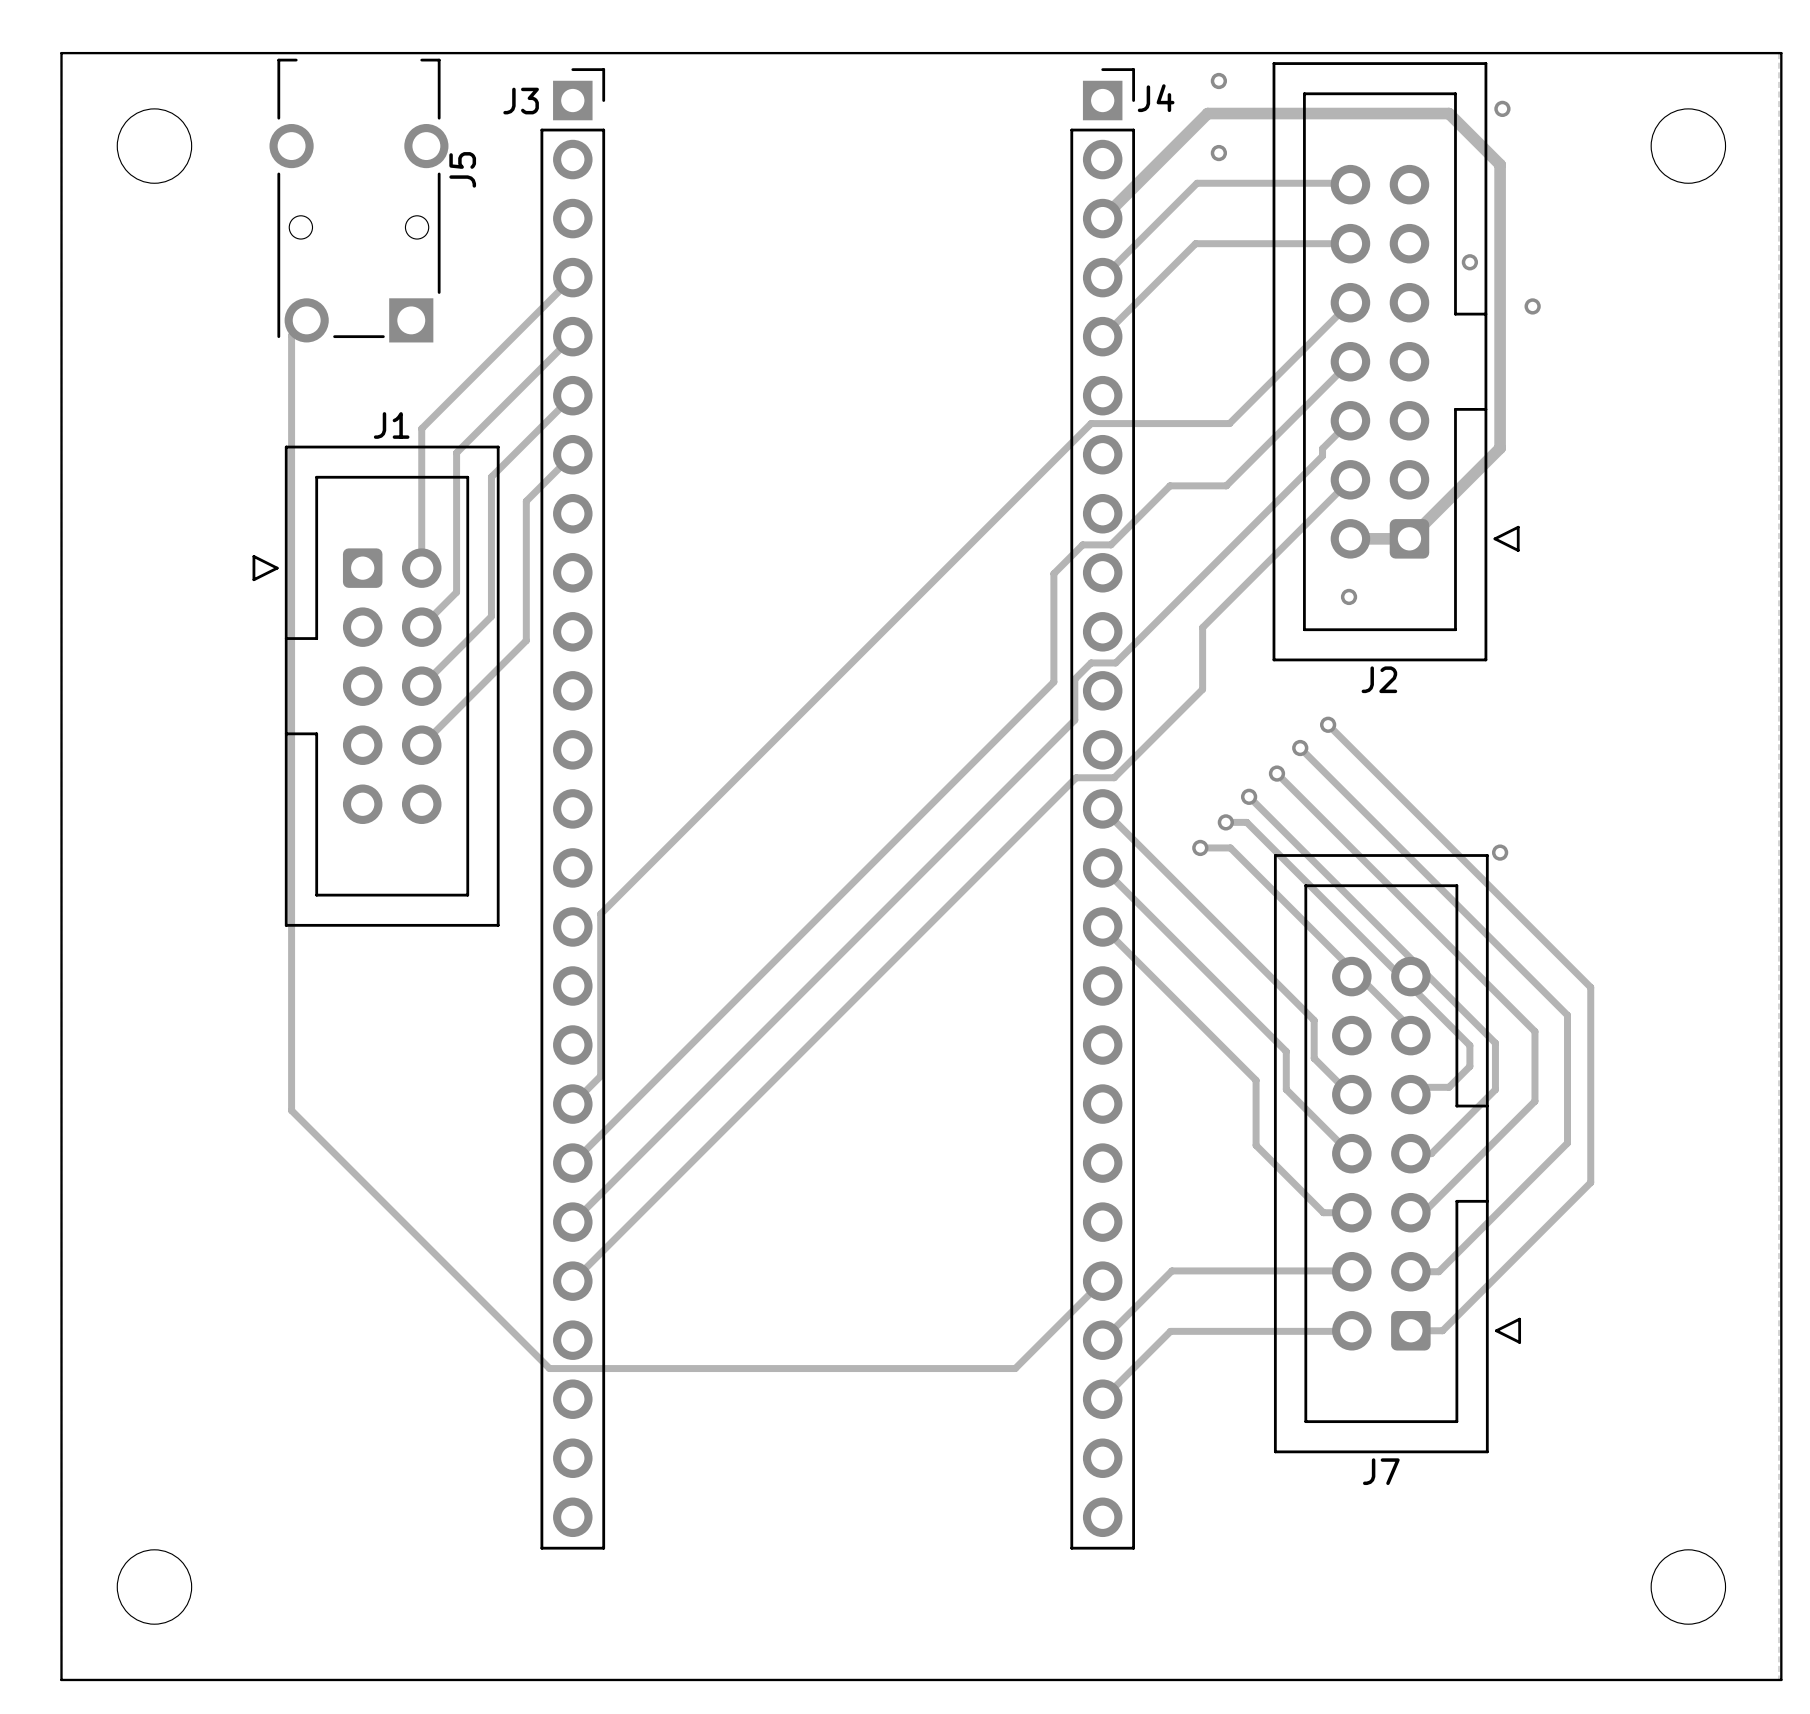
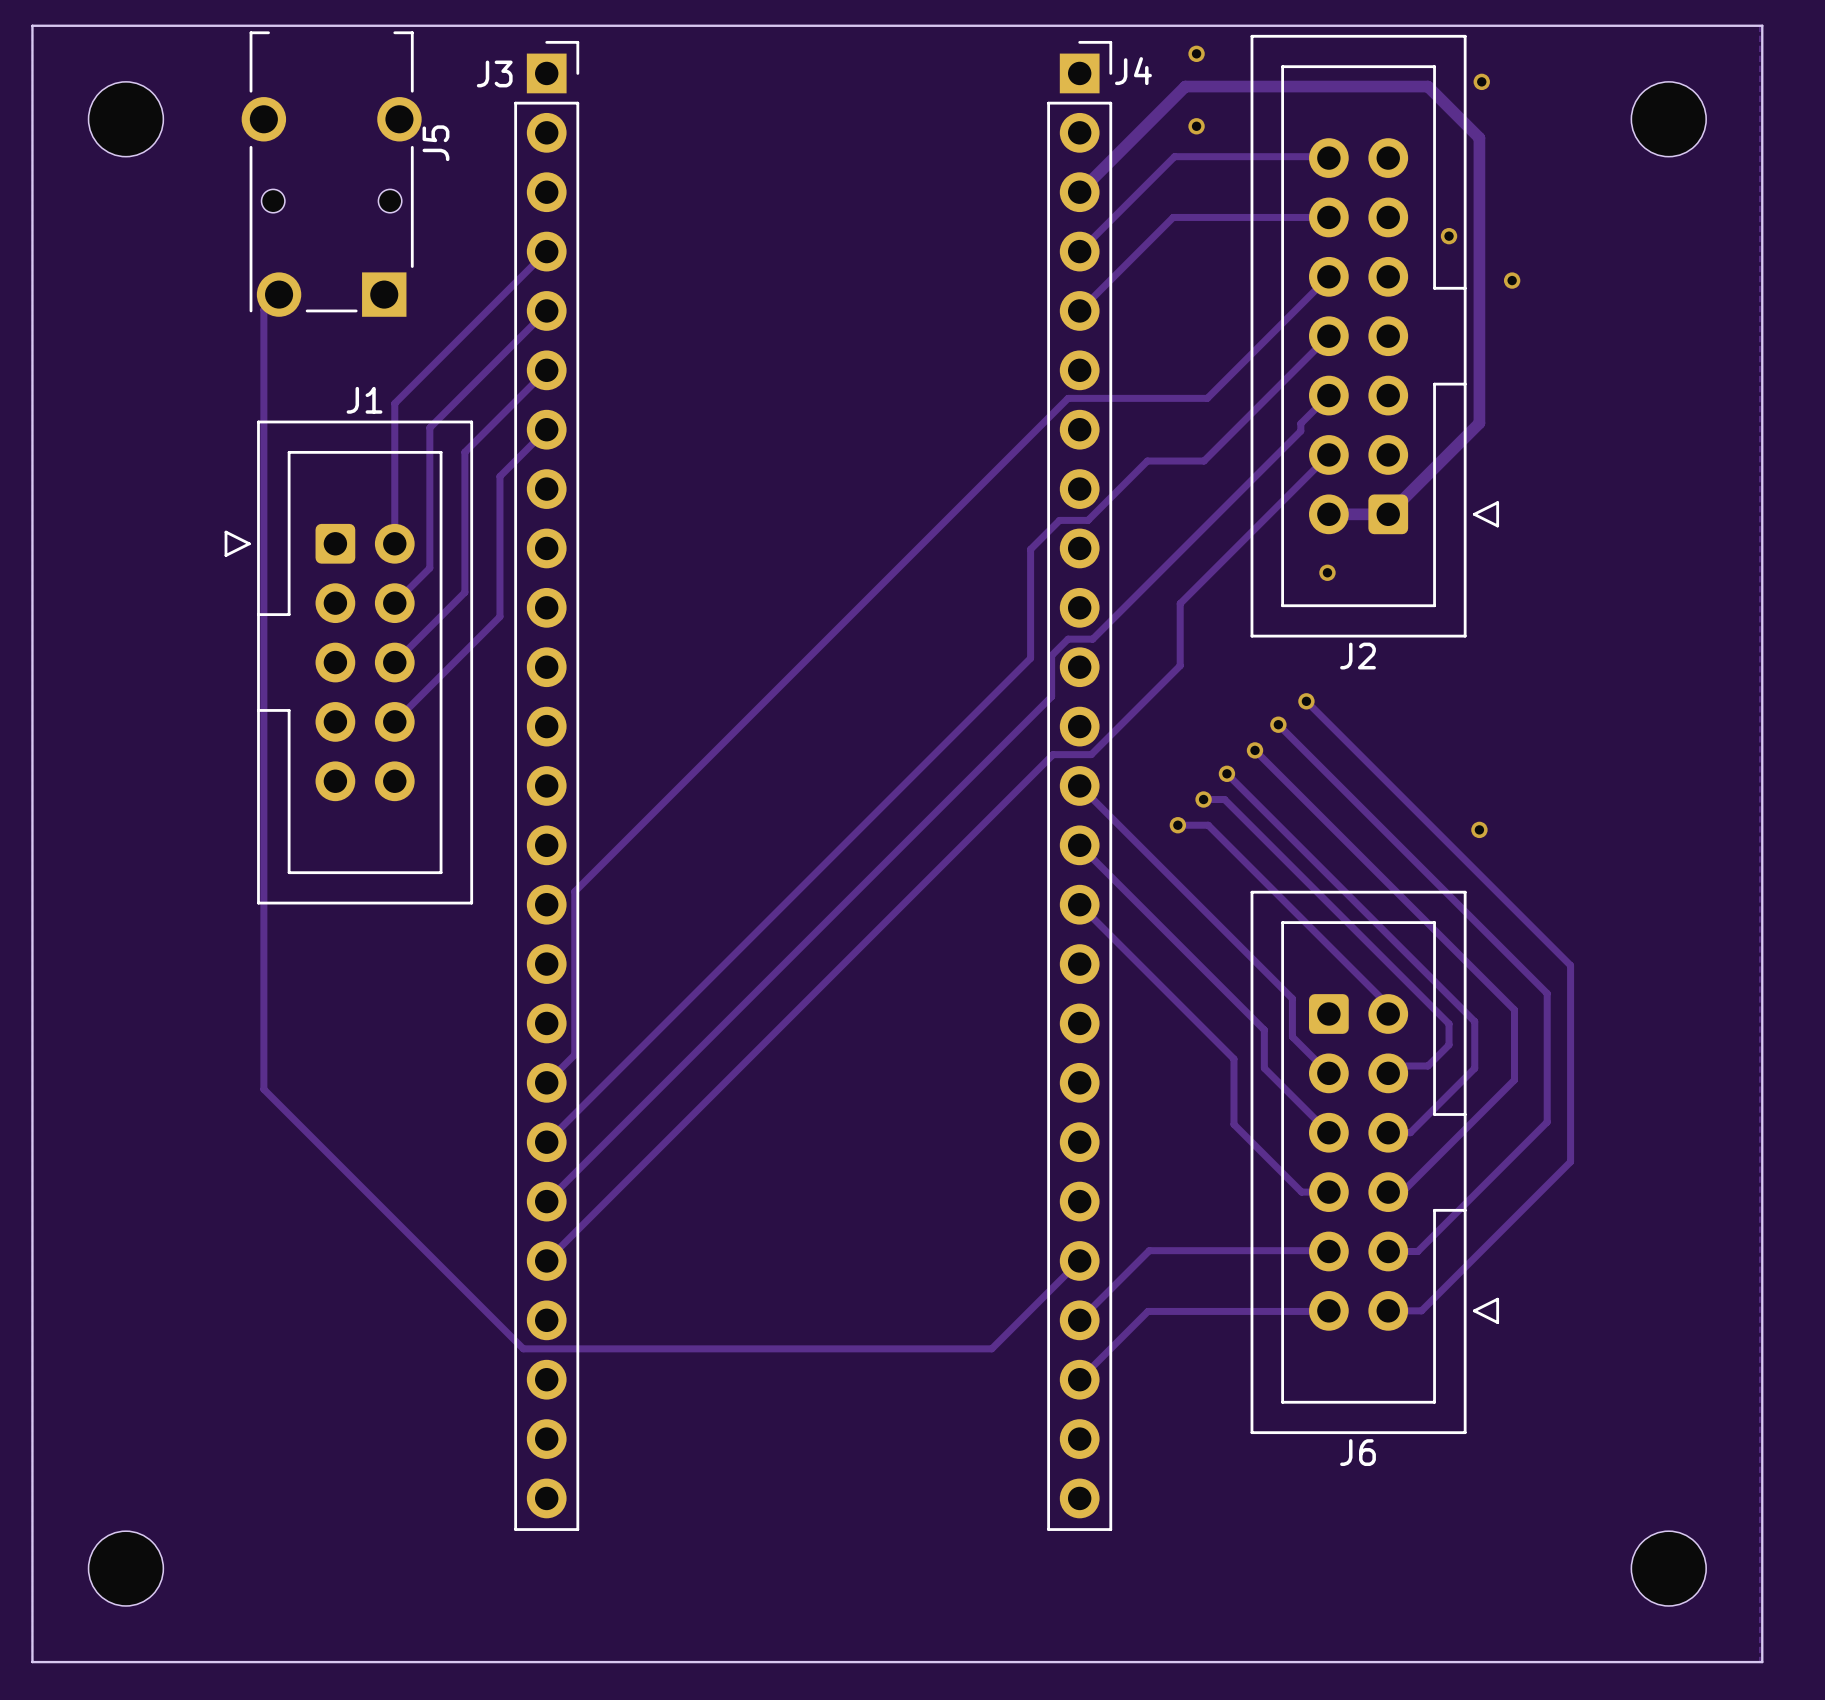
J7: (1397, 1153) -> none
J6: none -> (1374, 1162)

